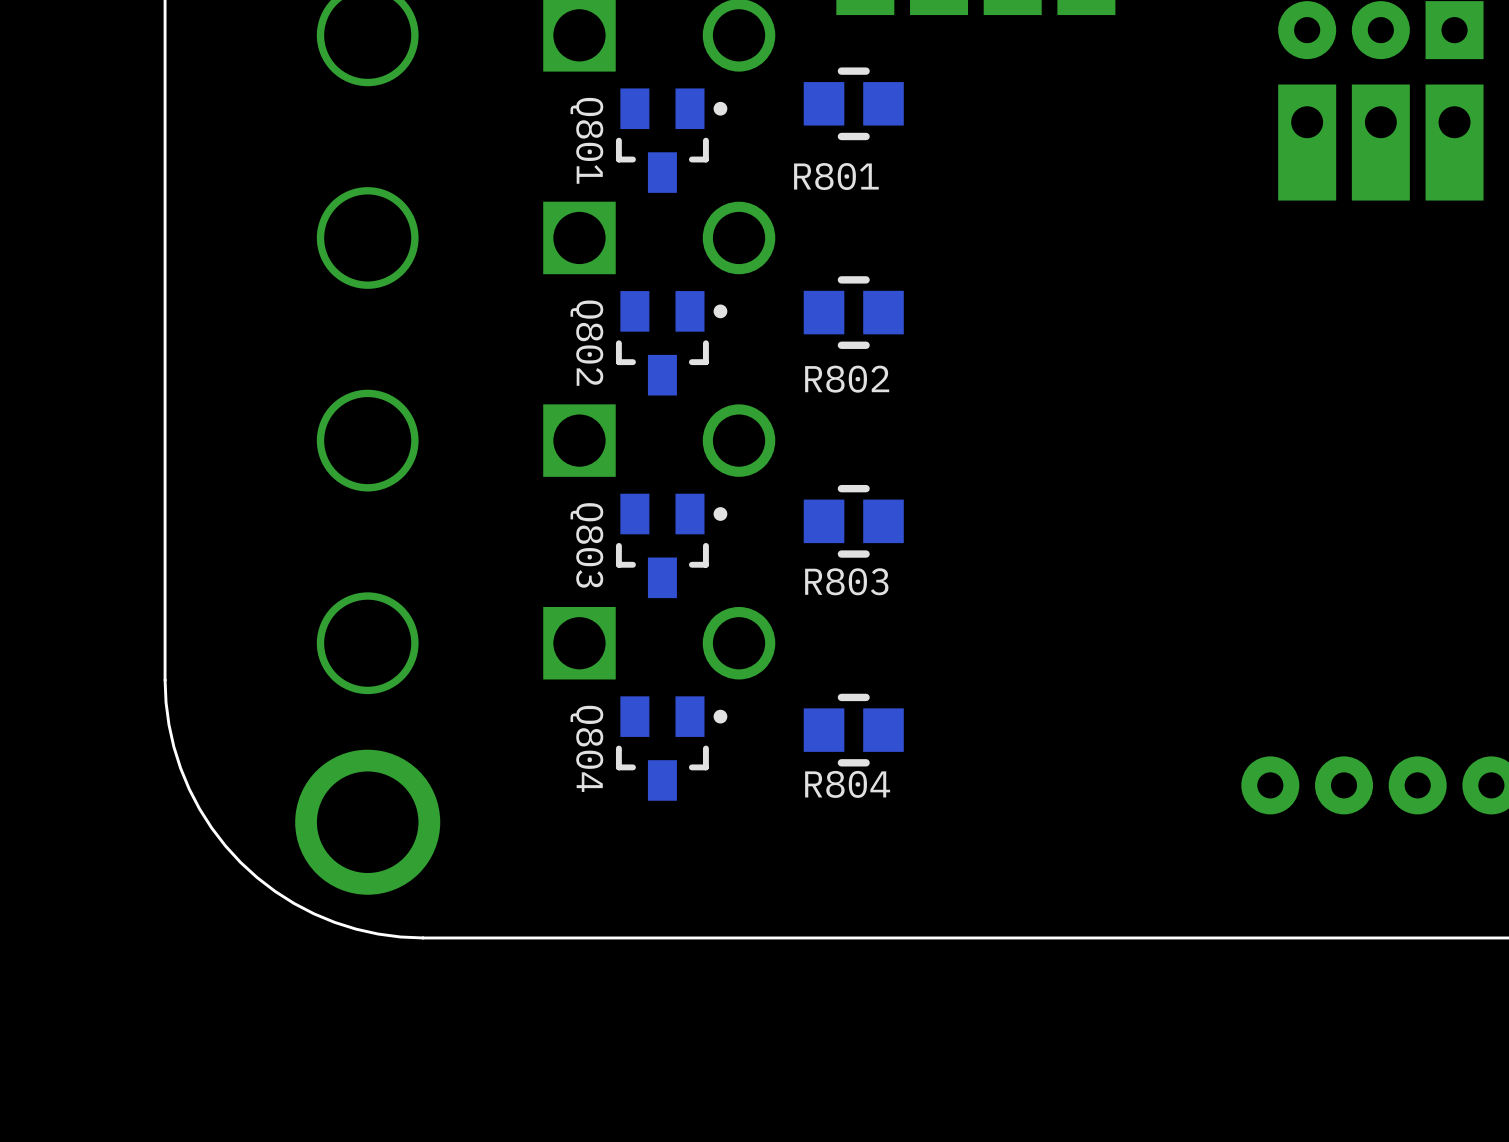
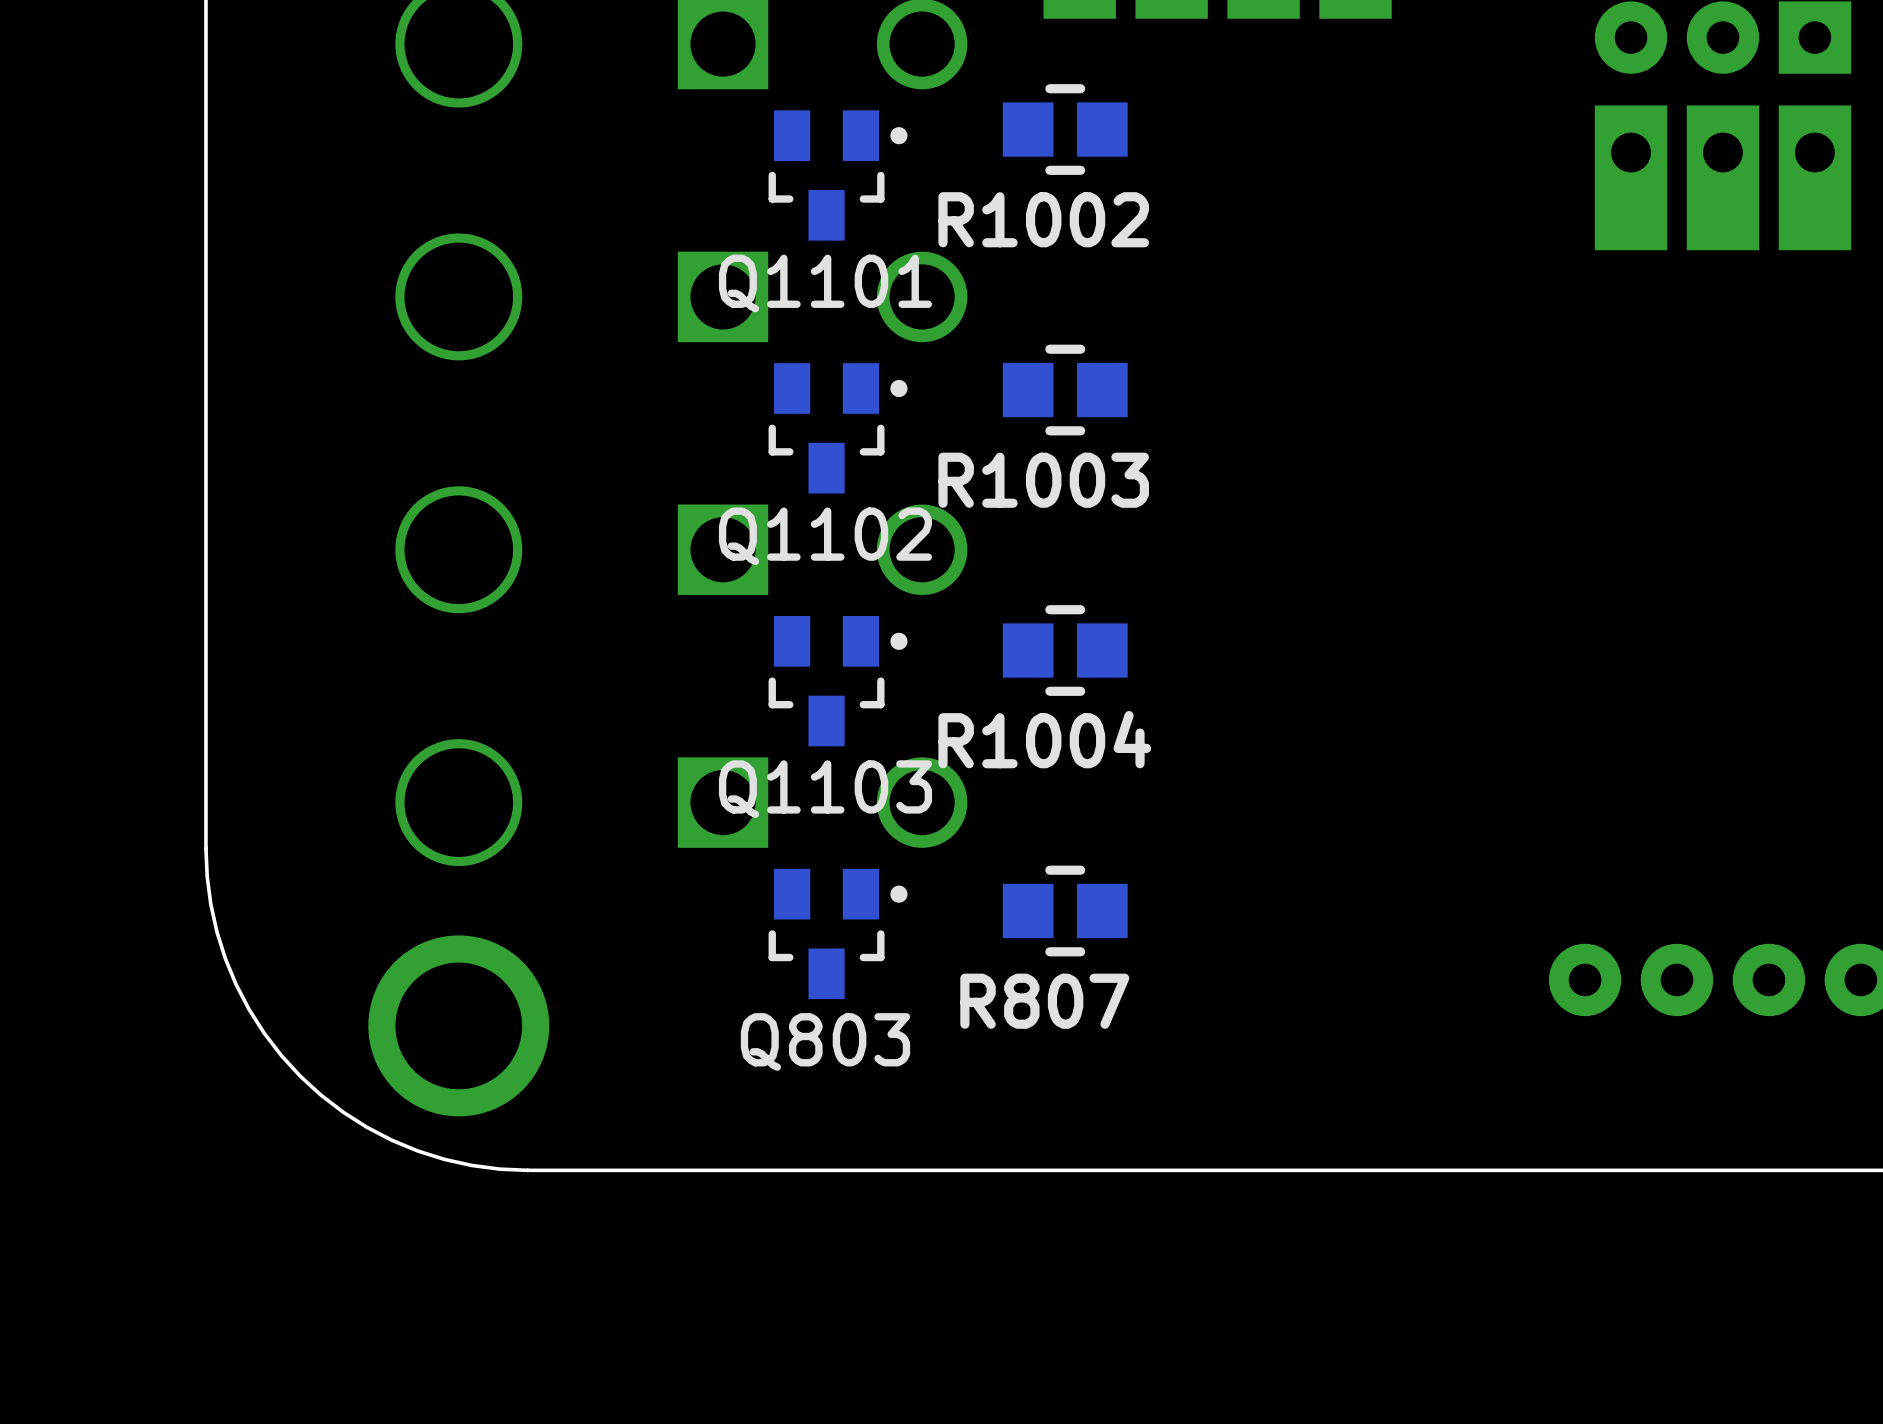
Q801 name: Q801 (586, 140) -> Q1101 (825, 283)
R801 name: R801 (836, 176) -> R1002 (1043, 219)
Q802 name: Q802 (586, 343) -> Q1102 (825, 536)
R802 name: R802 (847, 379) -> R1003 (1043, 480)
Q803 name: Q803 (586, 545) -> Q1103 (825, 789)
R803 name: R803 (846, 581) -> R1004 (1044, 739)
Q804 name: Q804 (586, 748) -> Q803 (825, 1041)
R804 name: R804 (847, 784) -> R807 (1044, 1001)

